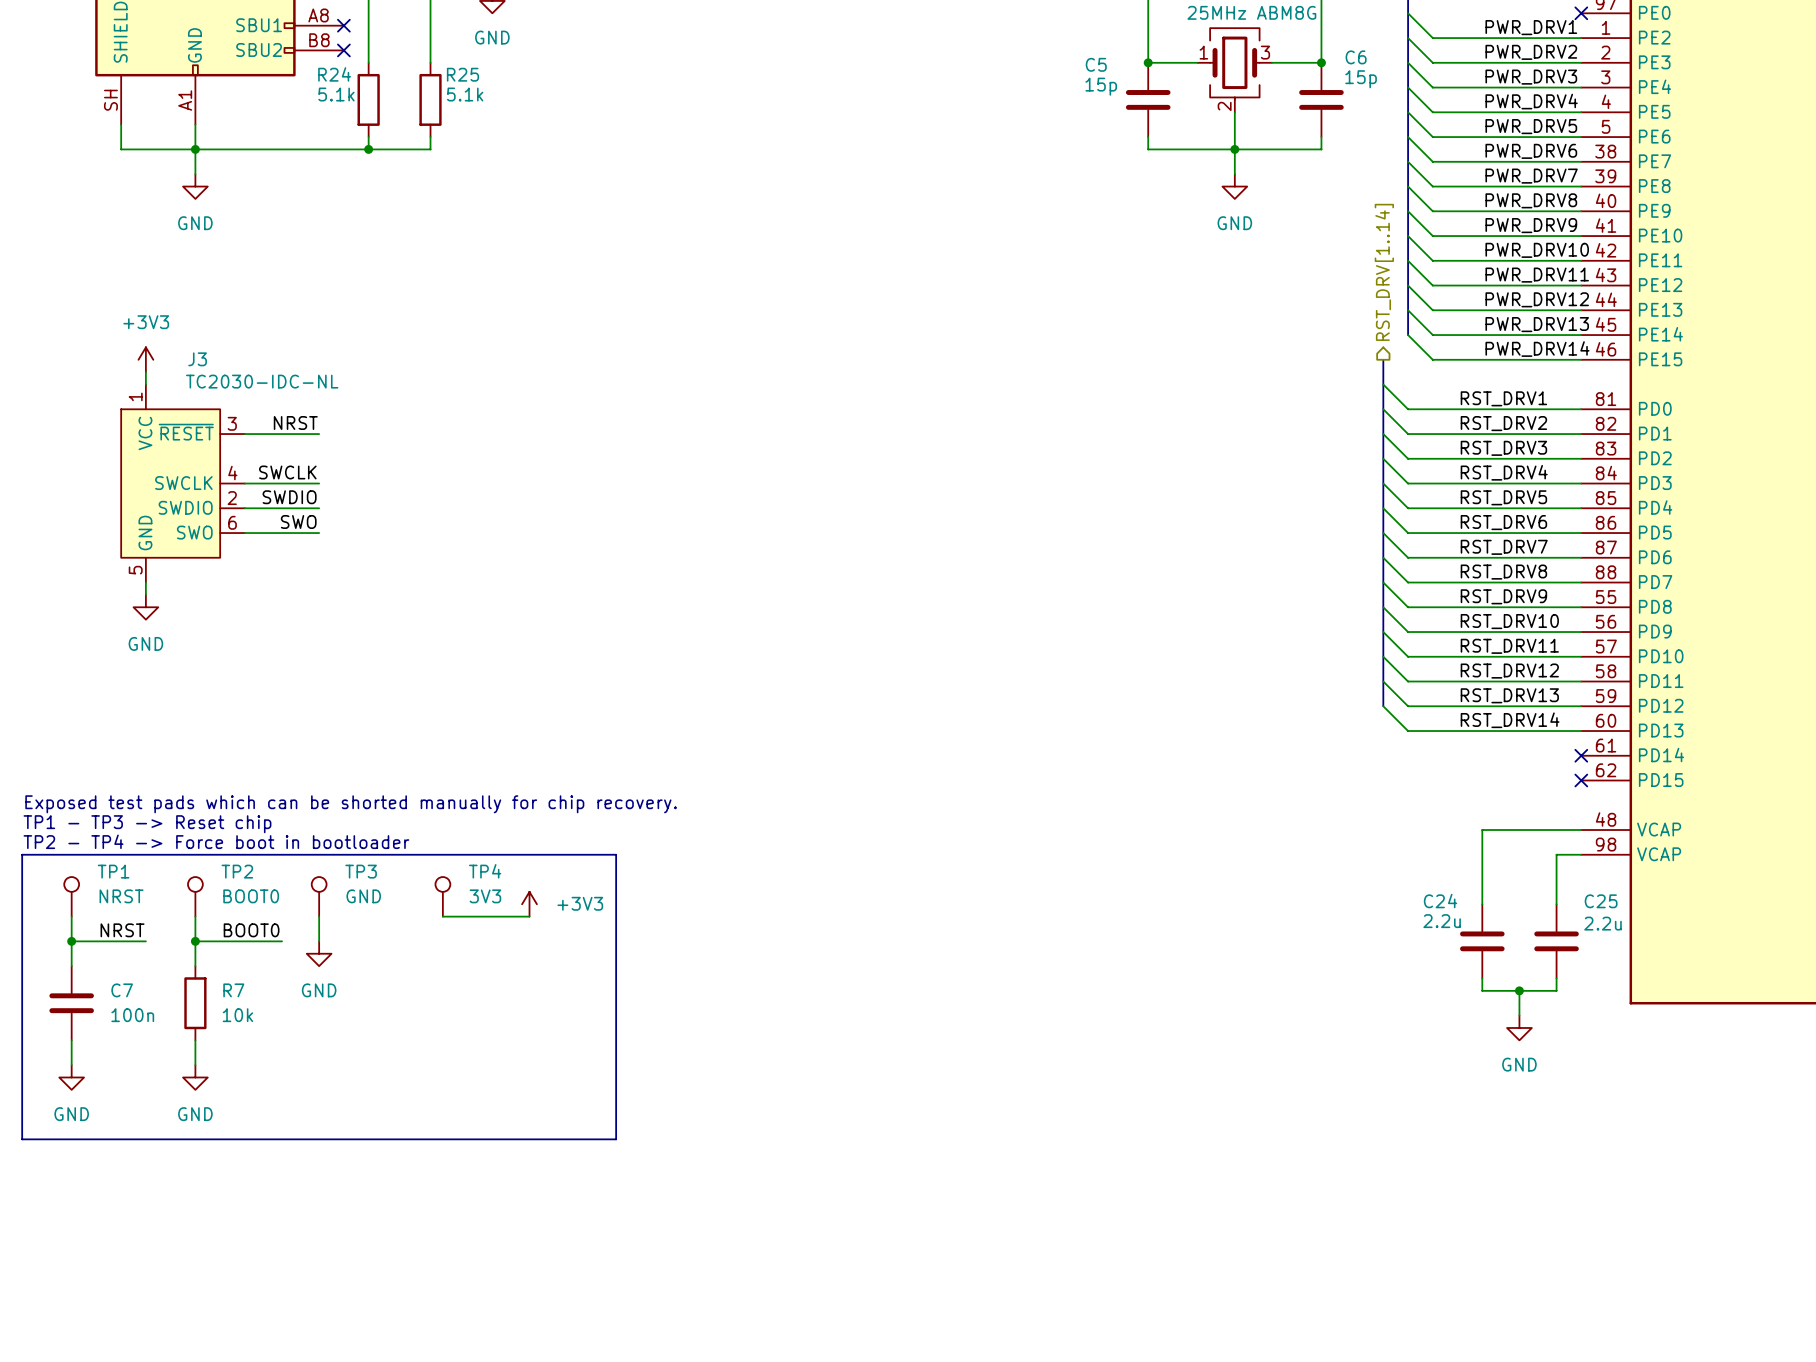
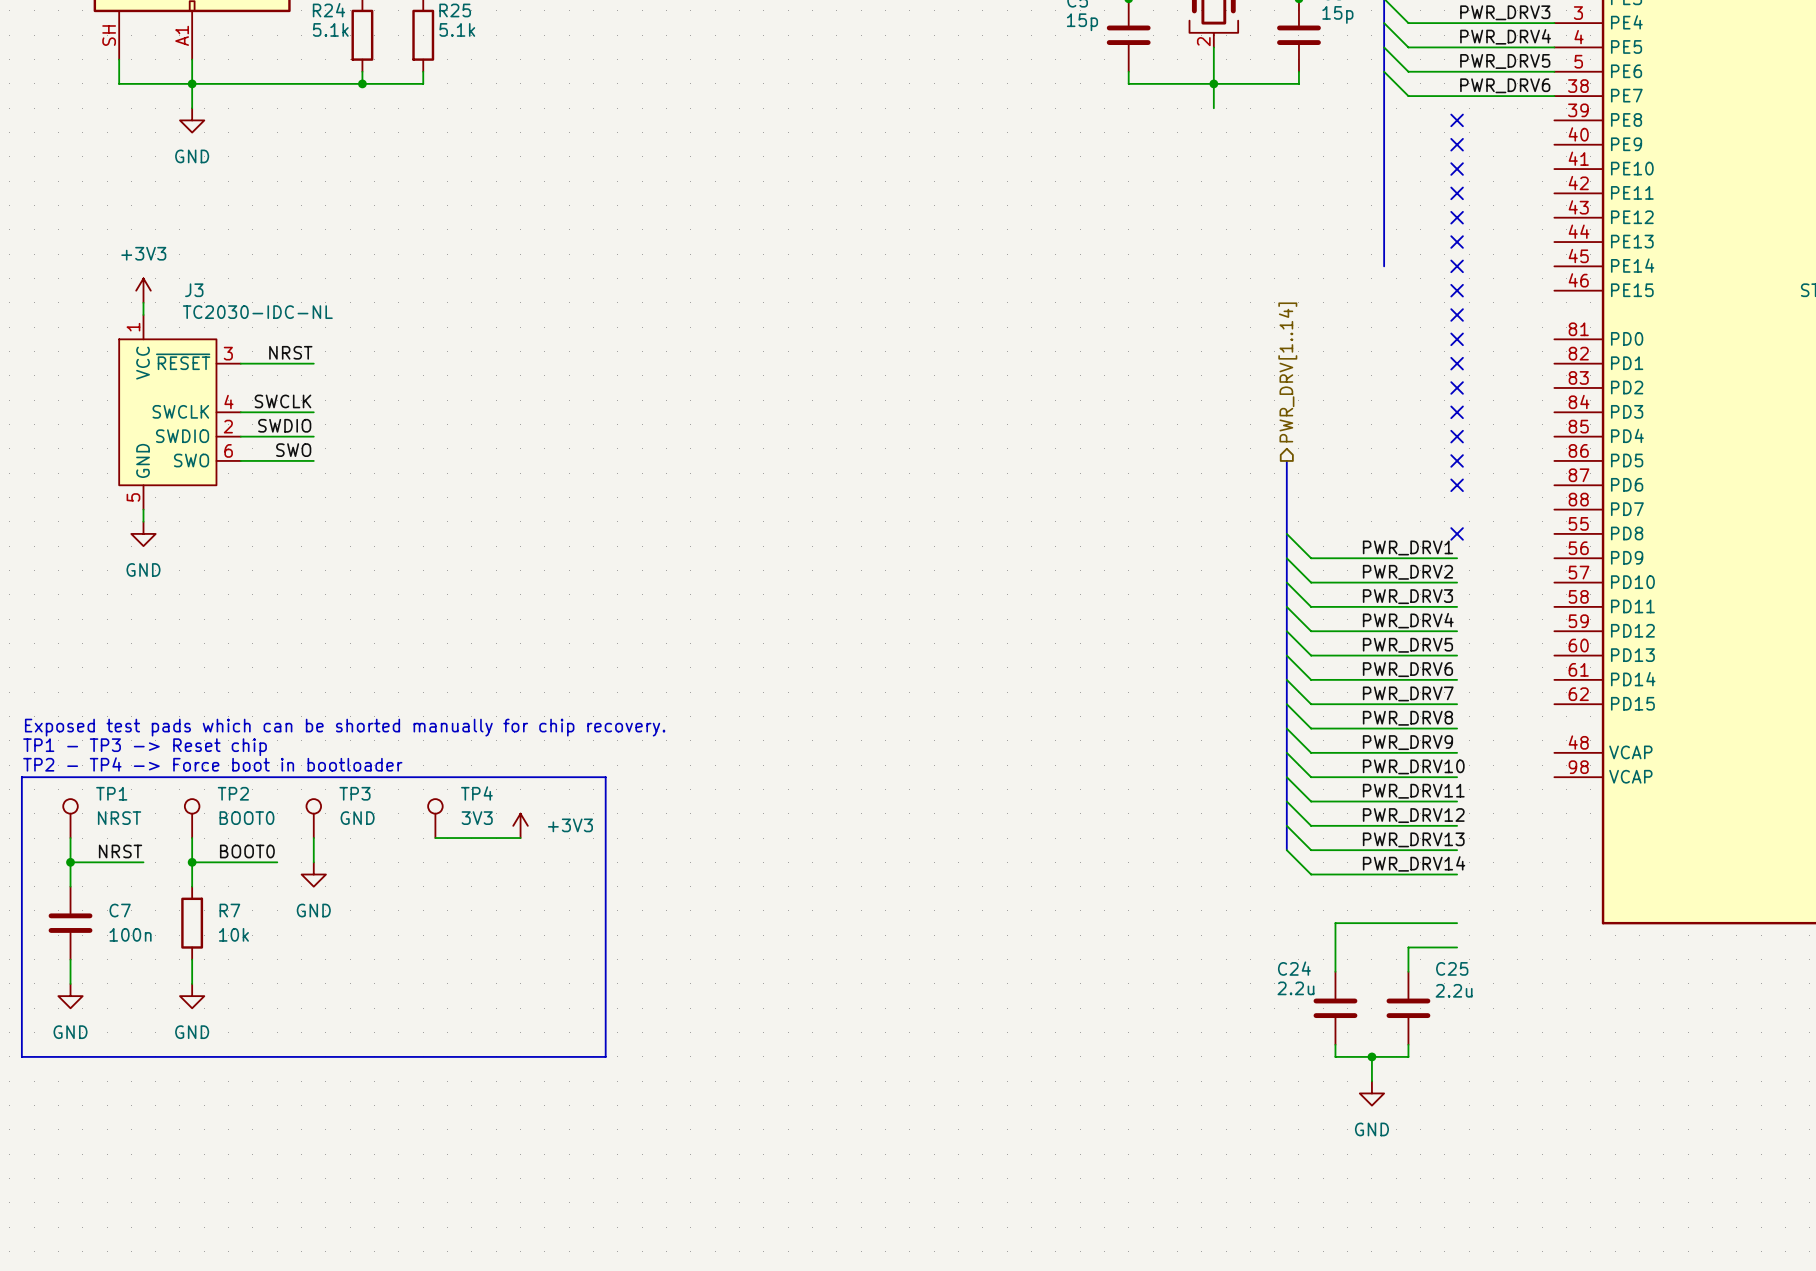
wire: (1408, 161) (1432, 186) (1581, 186) -> none
label: PWR_DRV7 (1531, 176) -> none
power symbol: GND (1234, 186) -> none
wire: (1408, 186) (1432, 211) (1581, 211) -> none
no-connect mark: none -> (1457, 120)
label: PWR_DRV8 (1531, 200) -> none
wire: (1408, 211) (1432, 236) (1581, 236) -> none
no-connect mark: none -> (1457, 144)
label: PWR_DRV9 (1531, 225) -> none
wire: (1408, 236) (1432, 260) (1581, 260) -> none
no-connect mark: none -> (1457, 169)
label: PWR_DRV10 (1537, 250) -> none
wire: (1408, 260) (1432, 285) (1581, 285) -> none
no-connect mark: none -> (1457, 193)
hierarchical label: RST_DRV[1..14] (1384, 272) -> none
label: PWR_DRV11 (1537, 275) -> none
wire: (1408, 285) (1432, 310) (1581, 310) -> none
no-connect mark: none -> (1457, 217)
label: PWR_DRV12 (1537, 299) -> none
wire: (1408, 310) (1432, 335) (1581, 335) -> none
no-connect mark: none -> (1457, 242)
label: PWR_DRV13 (1537, 324) -> none
wire: (1408, 335) (1432, 359) (1581, 359) -> none
no-connect mark: none -> (1457, 266)
label: PWR_DRV14 (1537, 349) -> none
bus: (1383, 359) (1383, 706) -> none
no-connect mark: none -> (1457, 290)
wire: (1383, 384) (1408, 409) (1581, 409) -> none
no-connect mark: none -> (1457, 315)
label: RST_DRV1 (1503, 398) -> none
wire: (1383, 409) (1408, 434) (1581, 434) -> none
no-connect mark: none -> (1457, 339)
label: RST_DRV2 (1503, 423) -> none
wire: (1383, 434) (1408, 458) (1581, 458) -> none
no-connect mark: none -> (1457, 363)
hierarchical label: none -> PWR_DRV[1..14] (1287, 372)
label: RST_DRV3 (1503, 448) -> none
wire: (1383, 458) (1408, 483) (1581, 483) -> none
no-connect mark: none -> (1457, 387)
label: RST_DRV4 (1504, 472) -> none
wire: (1383, 483) (1408, 508) (1581, 508) -> none
no-connect mark: none -> (1457, 412)
label: RST_DRV5 (1503, 497) -> none
wire: (1383, 508) (1408, 533) (1581, 533) -> none
no-connect mark: none -> (1457, 436)
label: RST_DRV6 (1503, 522) -> none
bus: none -> (1286, 460) (1286, 850)
wire: (1383, 533) (1408, 557) (1581, 557) -> none
no-connect mark: none -> (1457, 460)
label: RST_DRV7 (1504, 547) -> none
wire: (1383, 557) (1408, 582) (1581, 582) -> none
no-connect mark: none -> (1457, 485)
label: RST_DRV8 (1503, 572) -> none
wire: (1383, 582) (1408, 607) (1581, 607) -> none
label: RST_DRV9 (1503, 596) -> none
wire: (1383, 607) (1408, 632) -> (1286, 533) (1311, 558) (1384, 558)
no-connect mark: none -> (1457, 533)
label: none -> PWR_DRV1 (1407, 547)
label: RST_DRV10 (1509, 621) -> none
wire: (1383, 632) (1408, 656) -> (1286, 558) (1311, 582) (1384, 582)
wire: (1482, 632) (1581, 632) -> none
label: RST_DRV11 (1509, 646) -> none
wire: (1383, 656) (1408, 681) -> (1286, 582) (1311, 606) (1384, 606)
wire: (1482, 656) (1581, 656) -> none
label: RST_DRV12 (1509, 671) -> PWR_DRV2 (1407, 572)
wire: (1383, 681) (1408, 706) -> (1286, 606) (1311, 631) (1384, 631)
wire: (1482, 681) (1581, 681) -> none
label: RST_DRV13 (1509, 695) -> PWR_DRV3 (1407, 596)
wire: (1383, 706) (1408, 731) -> (1286, 631) (1311, 655) (1384, 655)
wire: (1482, 706) (1581, 706) -> none
label: none -> PWR_DRV5 (1407, 645)
label: RST_DRV14 (1510, 720) -> PWR_DRV4 (1408, 620)
wire: none -> (1286, 655) (1311, 679) (1457, 679)
wire: (1482, 731) (1581, 731) -> none
label: none -> PWR_DRV6 (1407, 669)
wire: none -> (1286, 679) (1311, 704) (1457, 704)
no-connect mark: (1581, 755) -> none
label: none -> PWR_DRV7 (1408, 693)
wire: none -> (1286, 704) (1311, 728) (1457, 728)
no-connect mark: (1581, 780) -> none
label: none -> PWR_DRV8 (1407, 718)
wire: none -> (1286, 728) (1311, 752) (1457, 752)
label: none -> PWR_DRV9 (1407, 742)
wire: none -> (1286, 752) (1311, 777) (1457, 777)
wire: (1581, 830) (1482, 830) (1482, 904) -> (1286, 801) (1311, 825) (1457, 825)
label: none -> PWR_DRV10 (1413, 766)
wire: none -> (1286, 777) (1311, 801) (1457, 801)
wire: (1581, 854) (1556, 854) (1556, 904) -> none
label: none -> PWR_DRV11 (1413, 791)
label: none -> PWR_DRV12 (1413, 815)
wire: none -> (1286, 825) (1311, 850) (1457, 850)
label: none -> PWR_DRV13 (1413, 839)
wire: none -> (1286, 850) (1311, 874) (1457, 874)
C24 position: (1482, 941) -> (1335, 1008)
C25 position: (1556, 941) -> (1408, 1008)
label: none -> PWR_DRV14 (1414, 863)
wire: (1482, 978) (1482, 990) (1556, 990) (1556, 978) -> (1335, 1044) (1335, 1056) (1408, 1056) (1408, 1044)
wire: (1519, 990) (1519, 1015) -> (1371, 1056) (1371, 1081)
junction: (1519, 990) -> none
wire: none -> (1457, 923) (1335, 923) (1335, 971)
wire: none -> (1457, 947) (1408, 947) (1408, 971)
power symbol position: GND (1519, 1027) -> GND (1371, 1093)
junction: none -> (1371, 1056)

